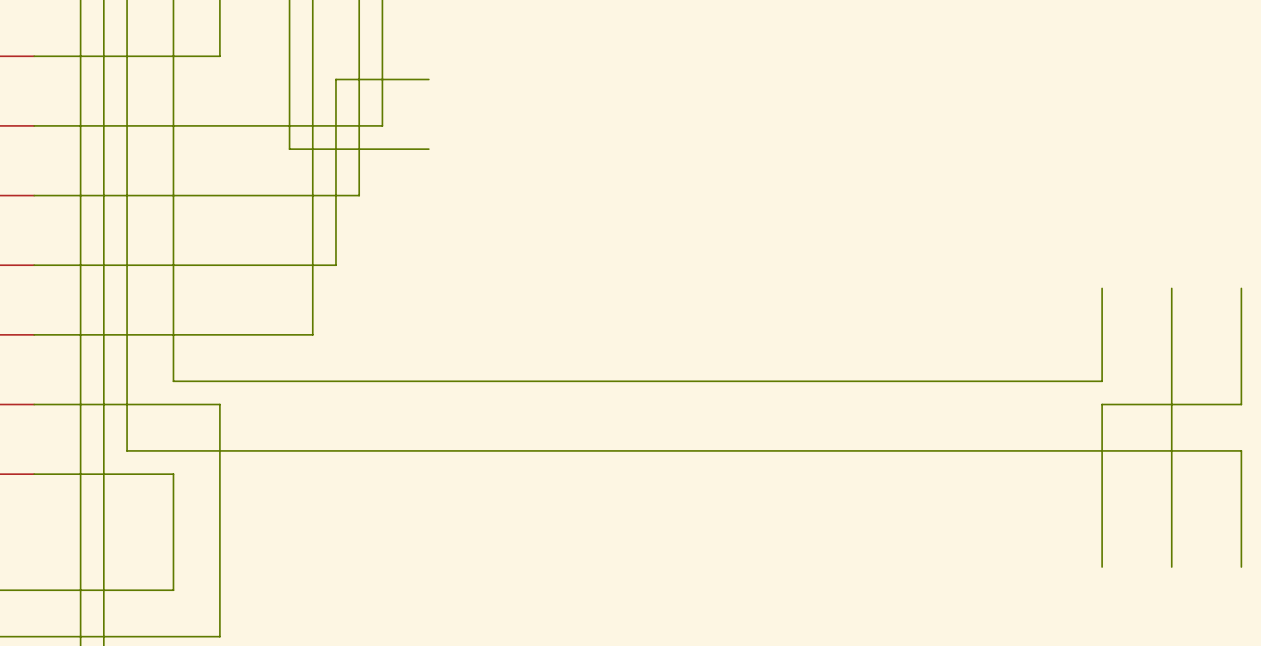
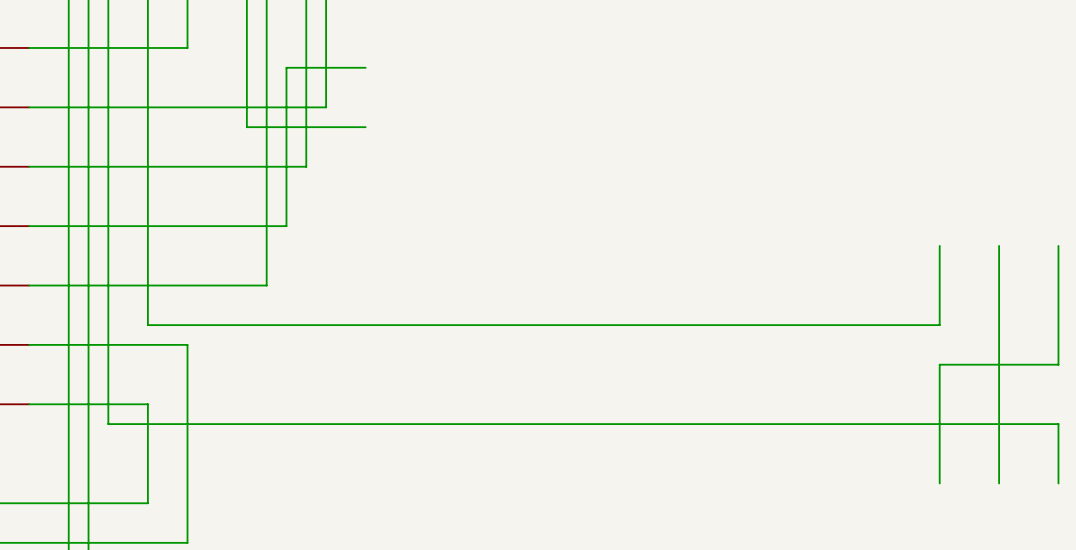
wire: (1241, 404) (1102, 404) (1102, 427) -> (1058, 344) (1058, 364) (939, 364)
wire: (127, 450) (1241, 450) (1241, 497) -> (108, 384) (108, 424) (1058, 424)

